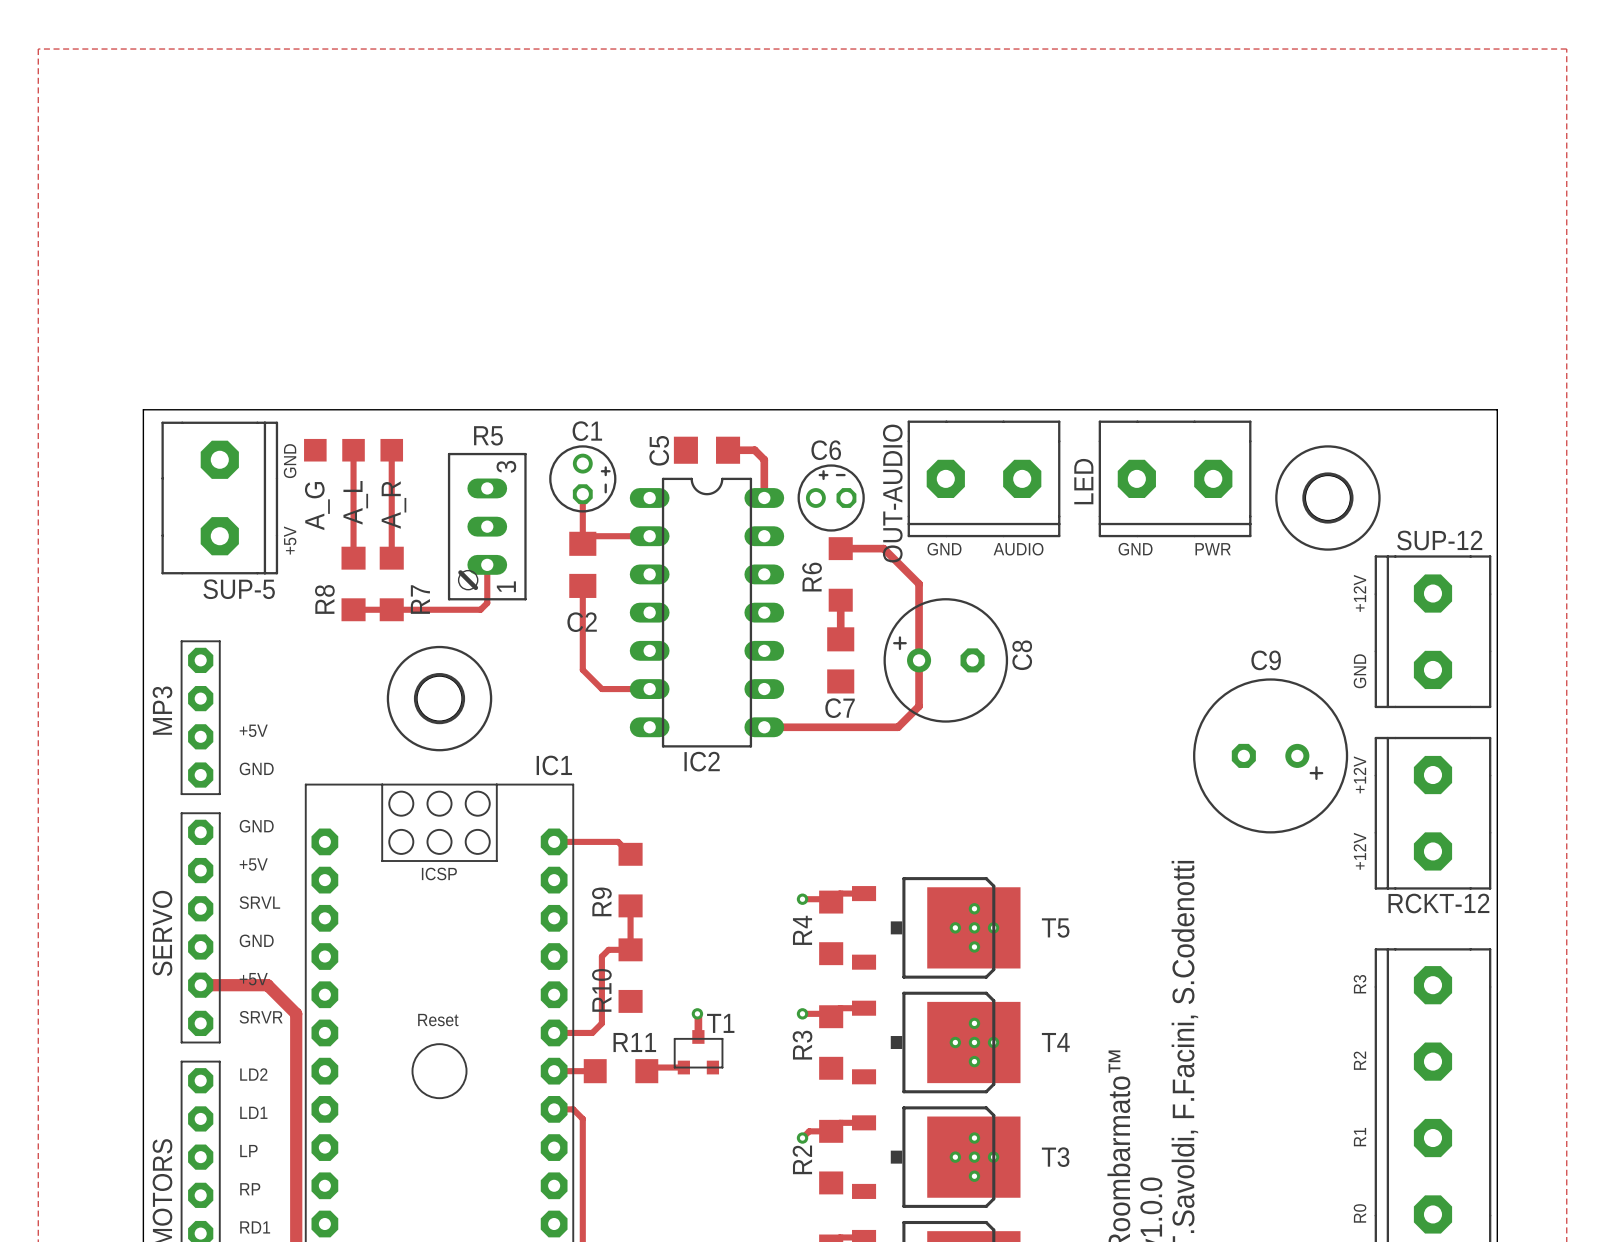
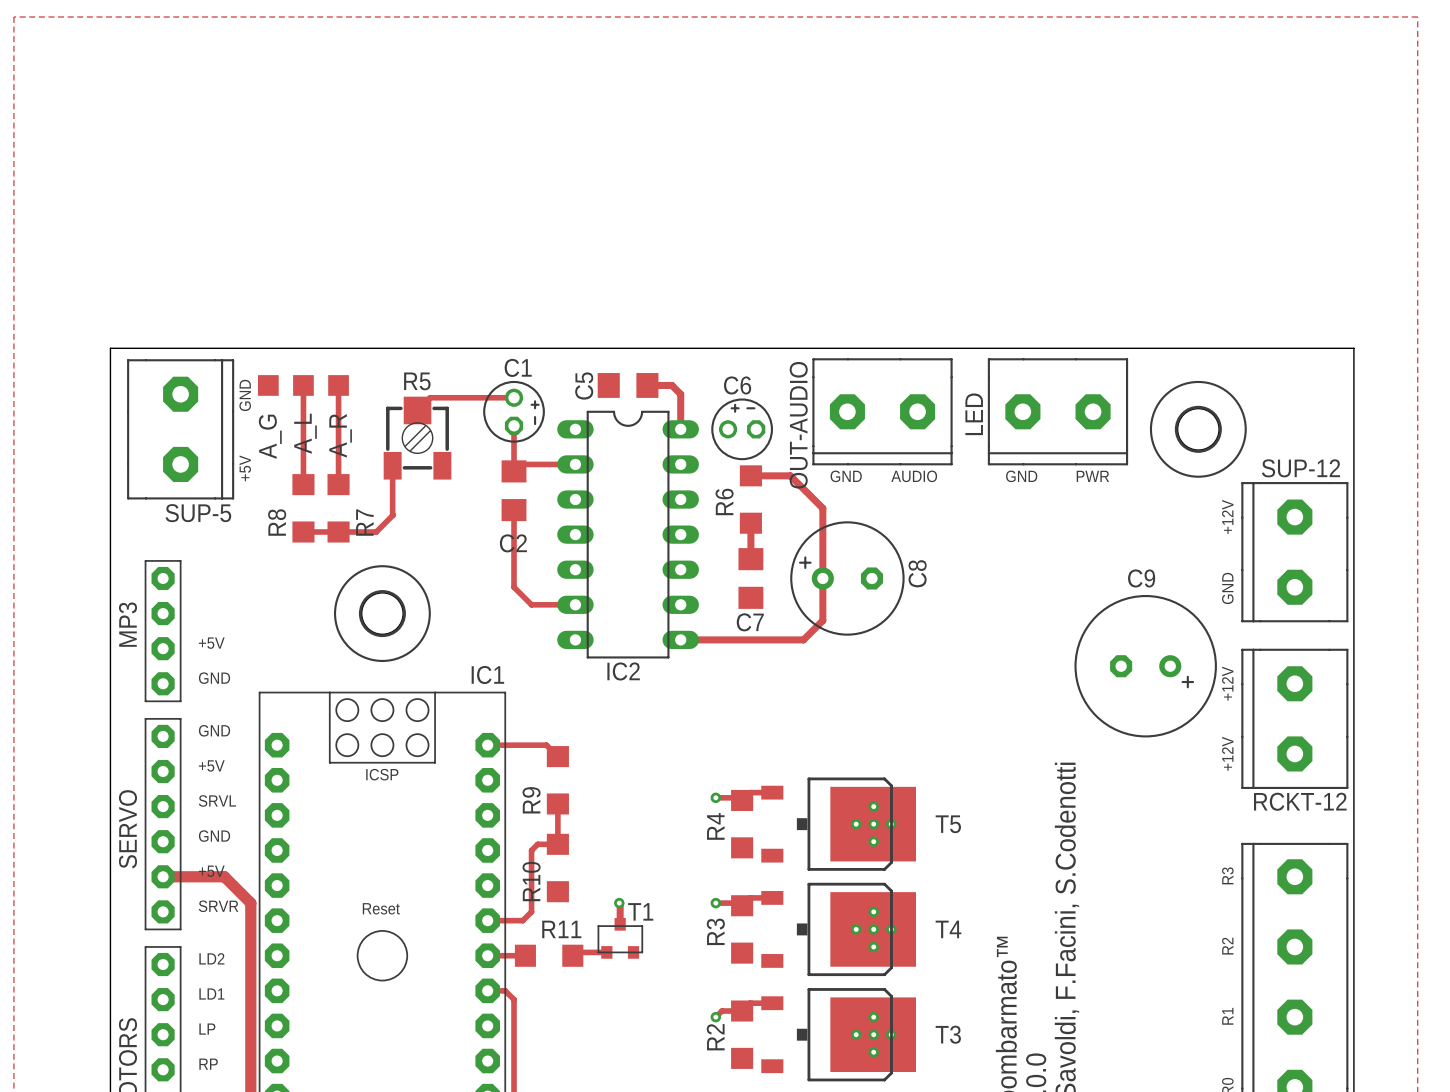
R5 name position: R5 (488, 435) -> R5 (417, 381)
R5 footprint: [447, 452, 527, 601] -> [383, 396, 452, 480]
track: none -> (514, 397) (430, 397) (417, 410)
track: (487, 564) (487, 603) (480, 609) (432, 609) -> (392, 465) (392, 515) (376, 531)

